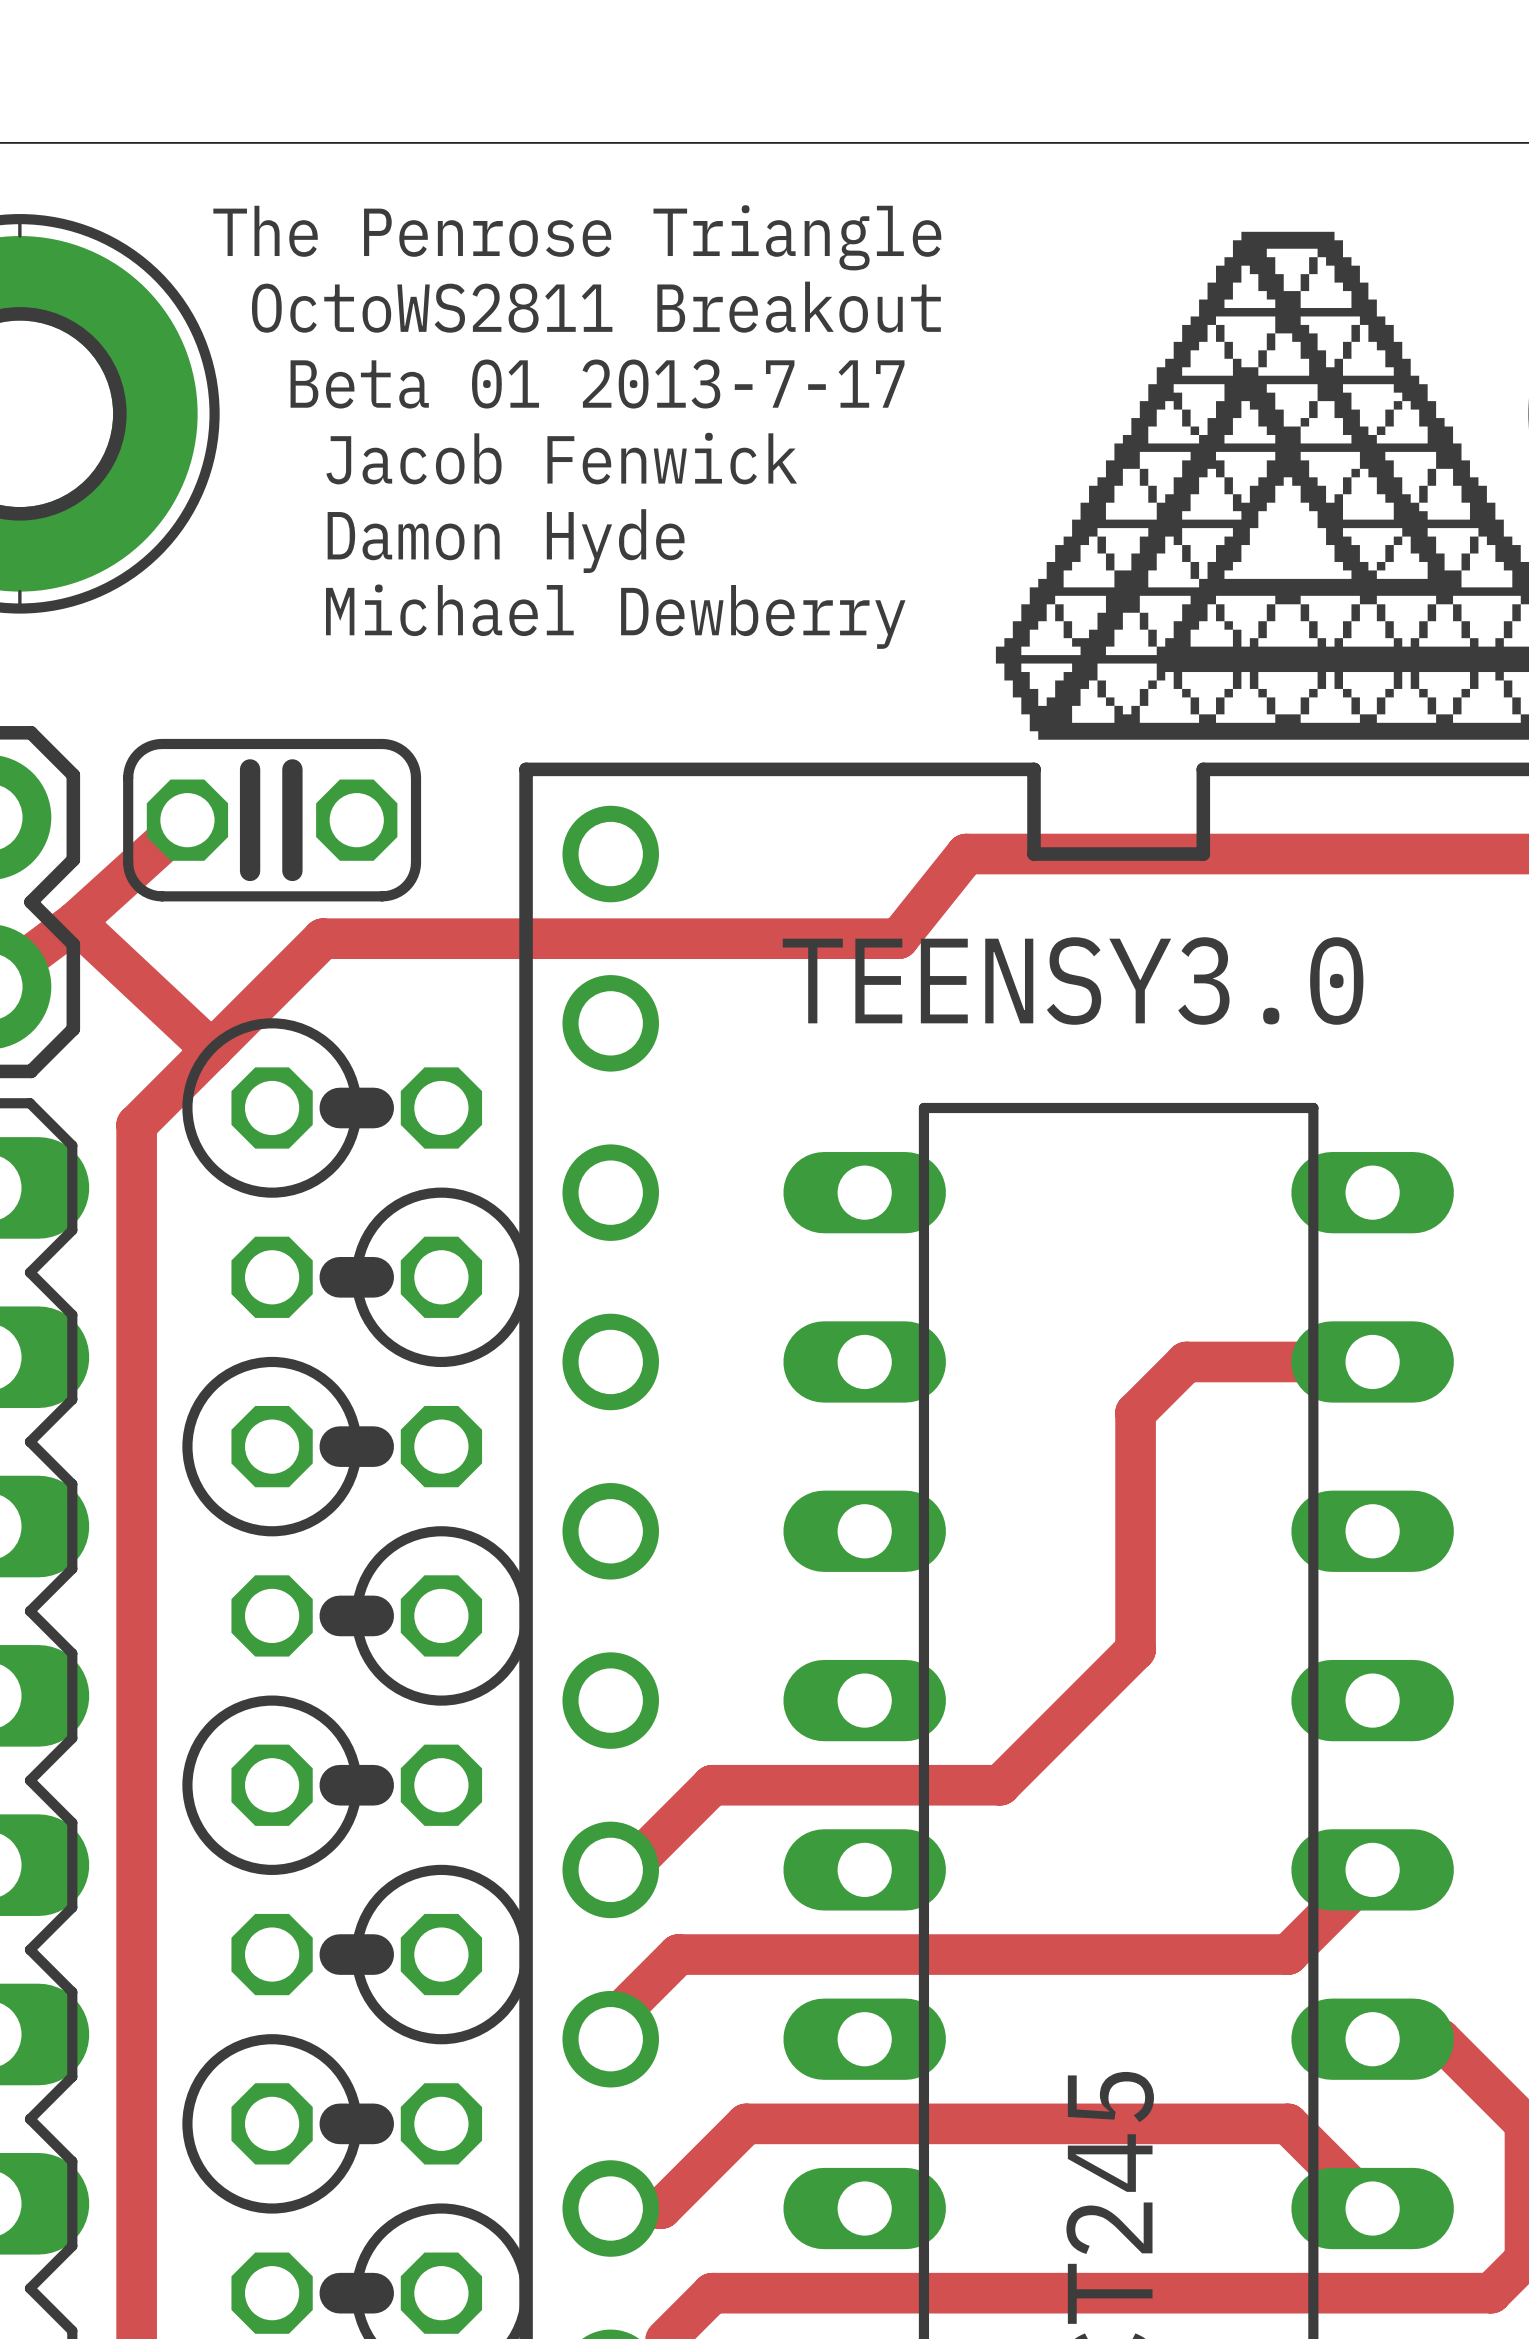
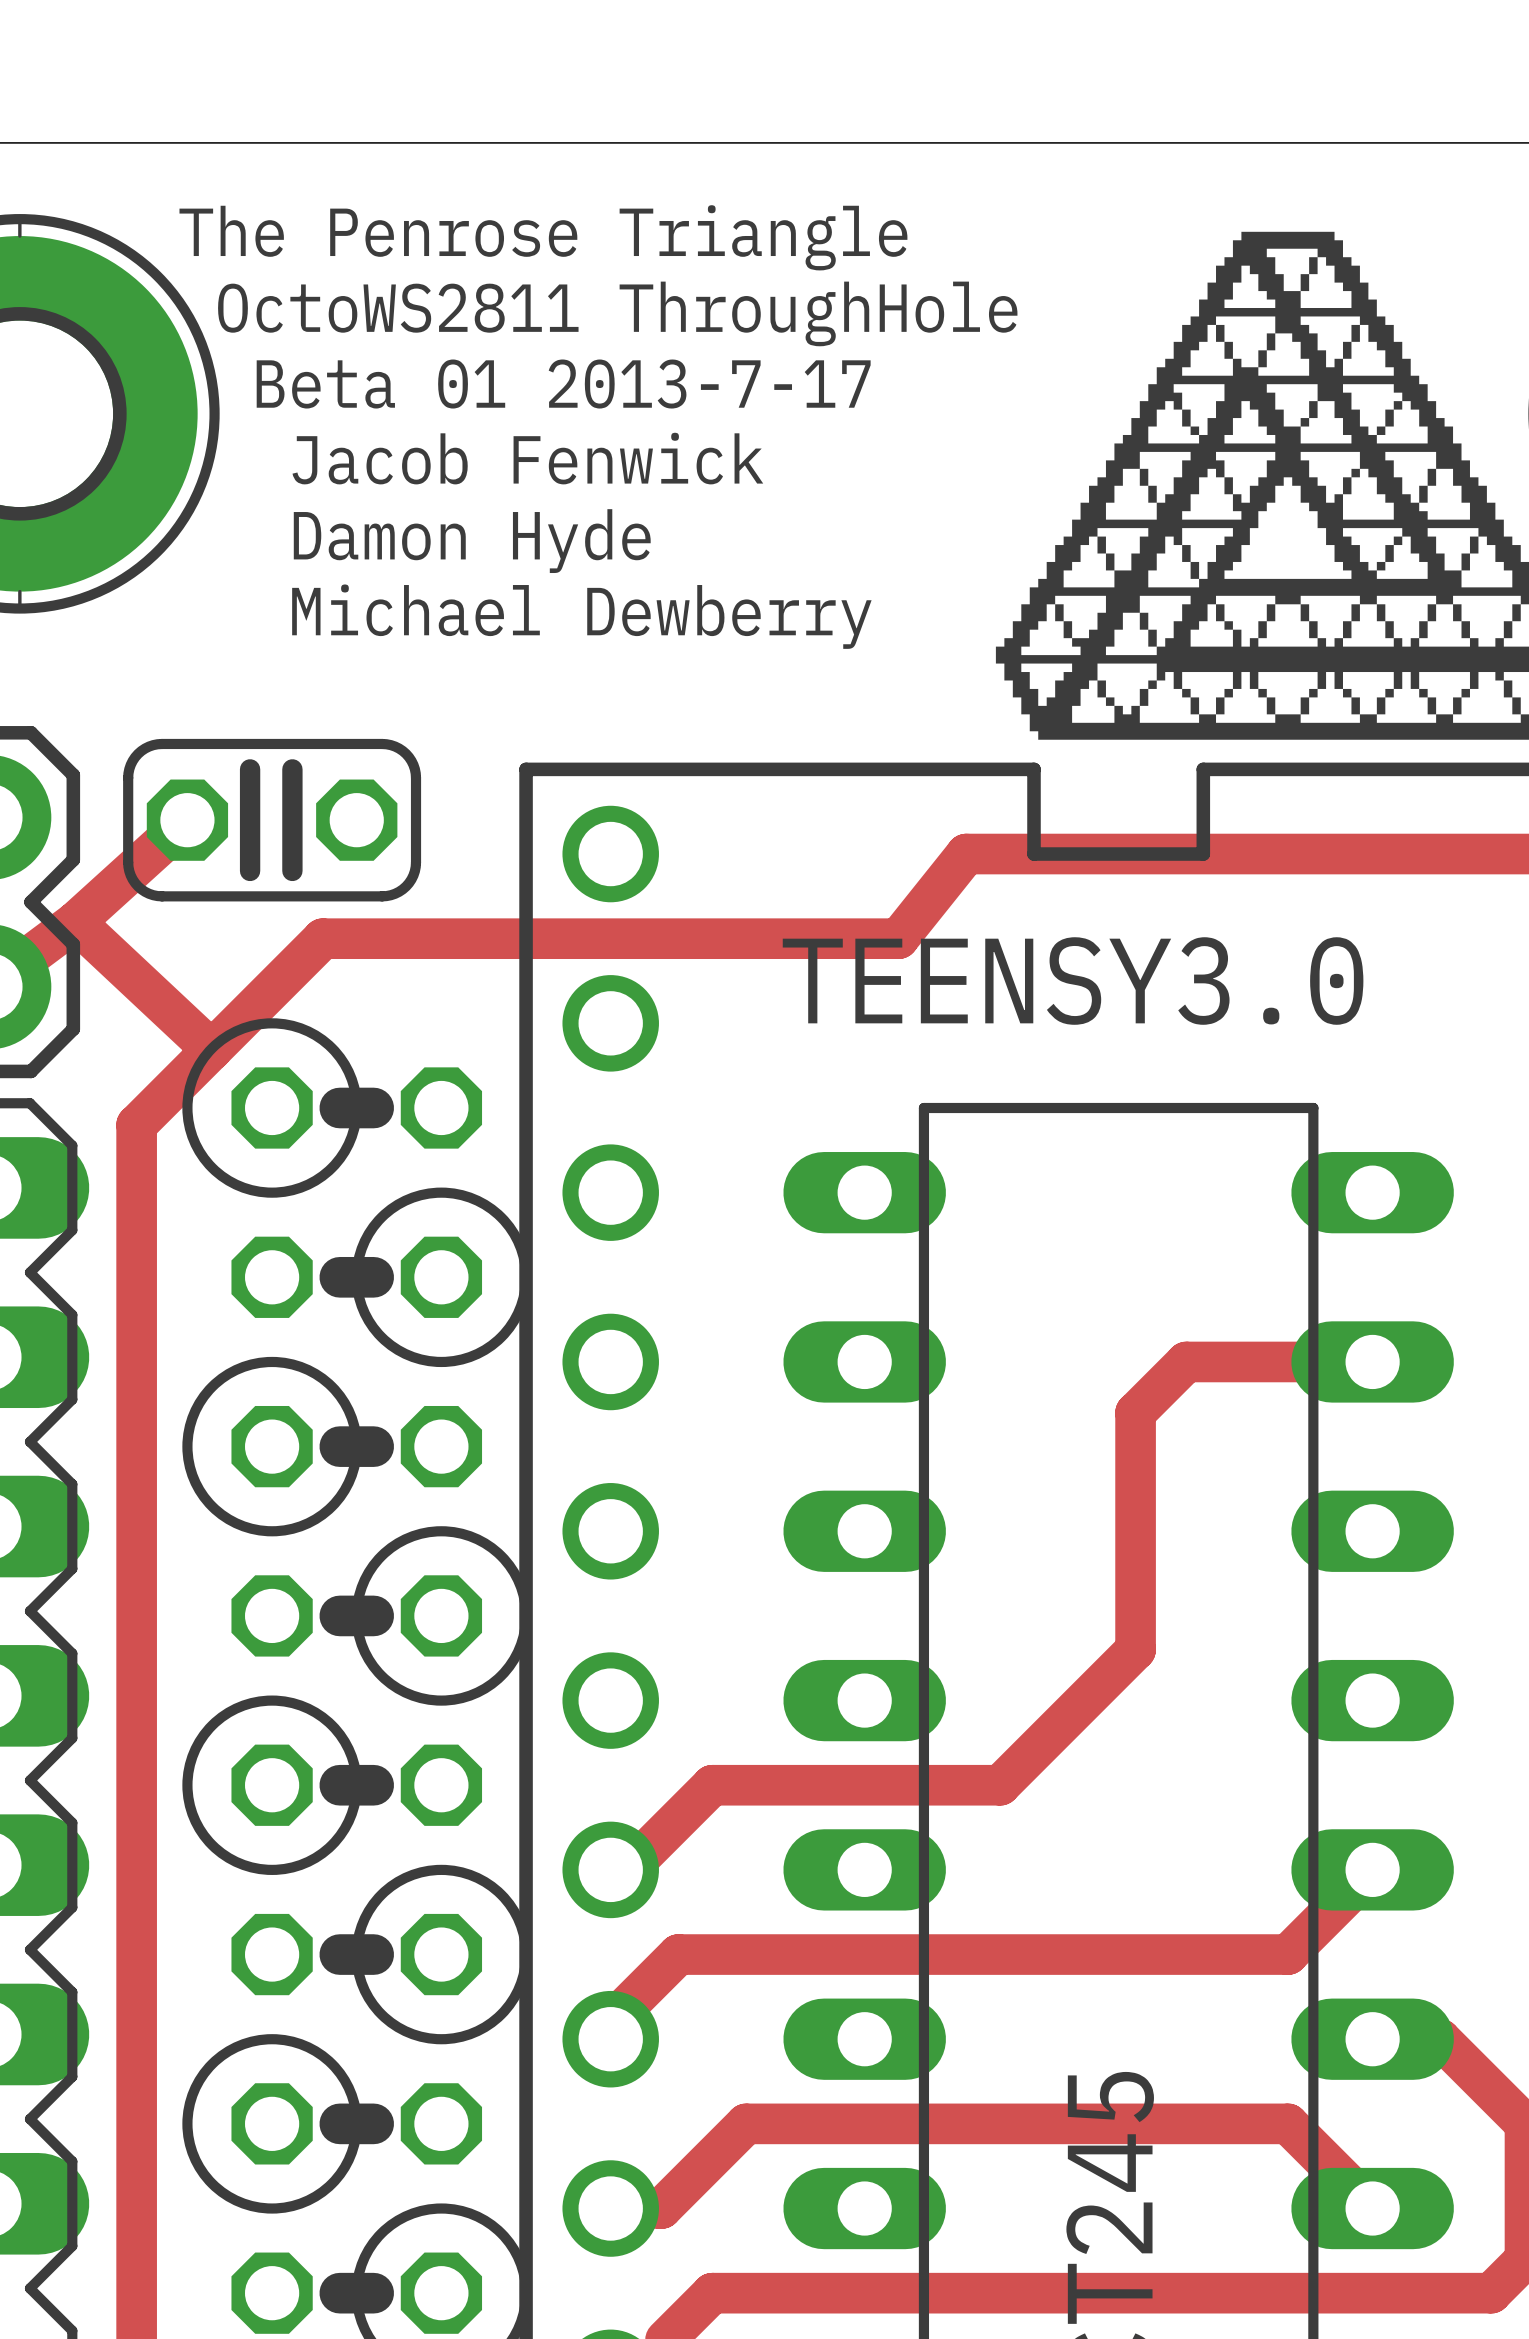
text position: The Penrose Triangle (577, 237) -> The Penrose Triangle (543, 237)
text: OctoWS2811 Breakout (596, 307) -> OctoWS2811 ThroughHole (617, 313)
text position: Beta 01 2013-7-17 (597, 384) -> Beta 01 2013-7-17 (563, 384)
text position: Jacob Fenwick (561, 458) -> Jacob Fenwick (527, 458)
text position: Damon Hyde (506, 541) -> Damon Hyde (472, 541)
text position: Michael Dewberry (615, 616) -> Michael Dewberry (581, 616)

